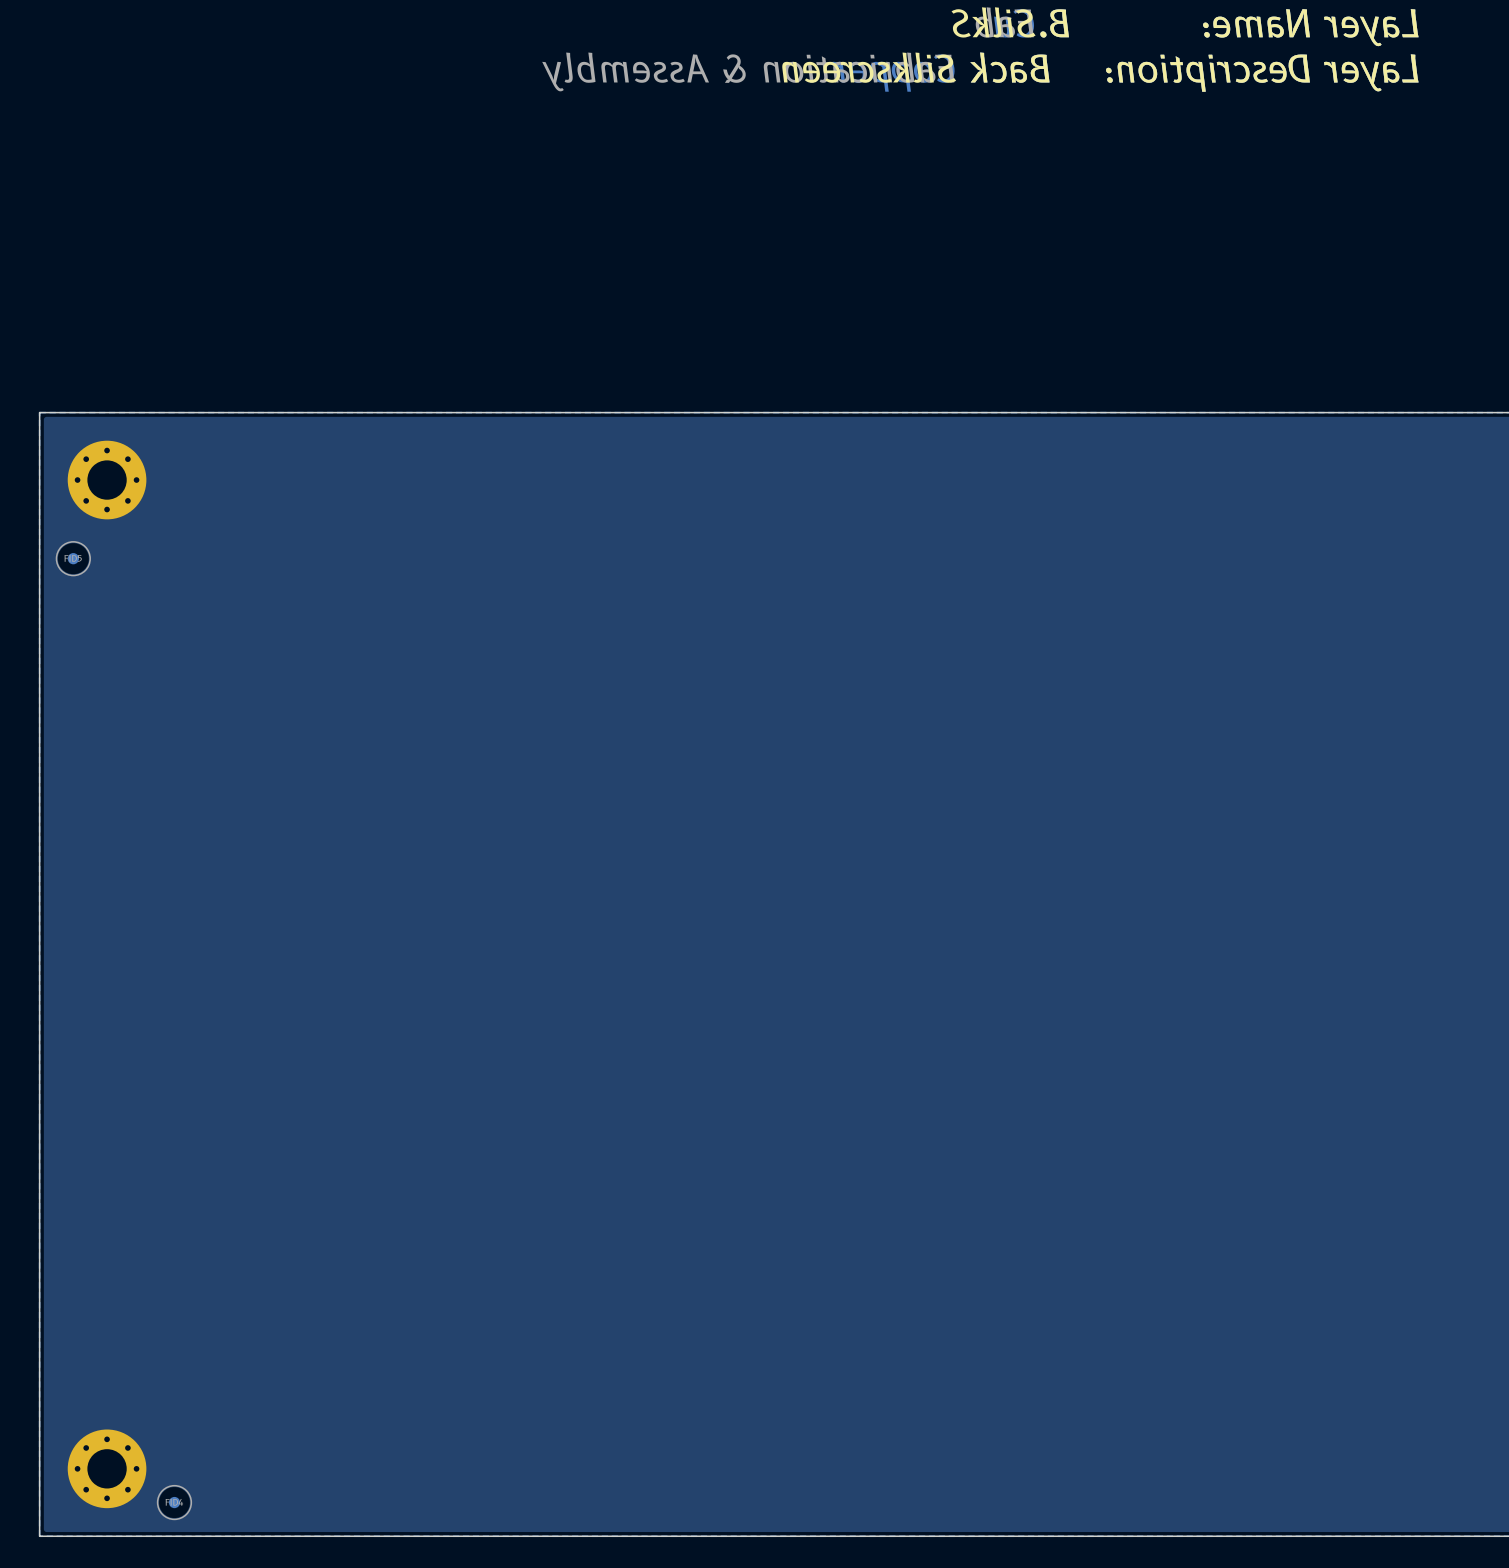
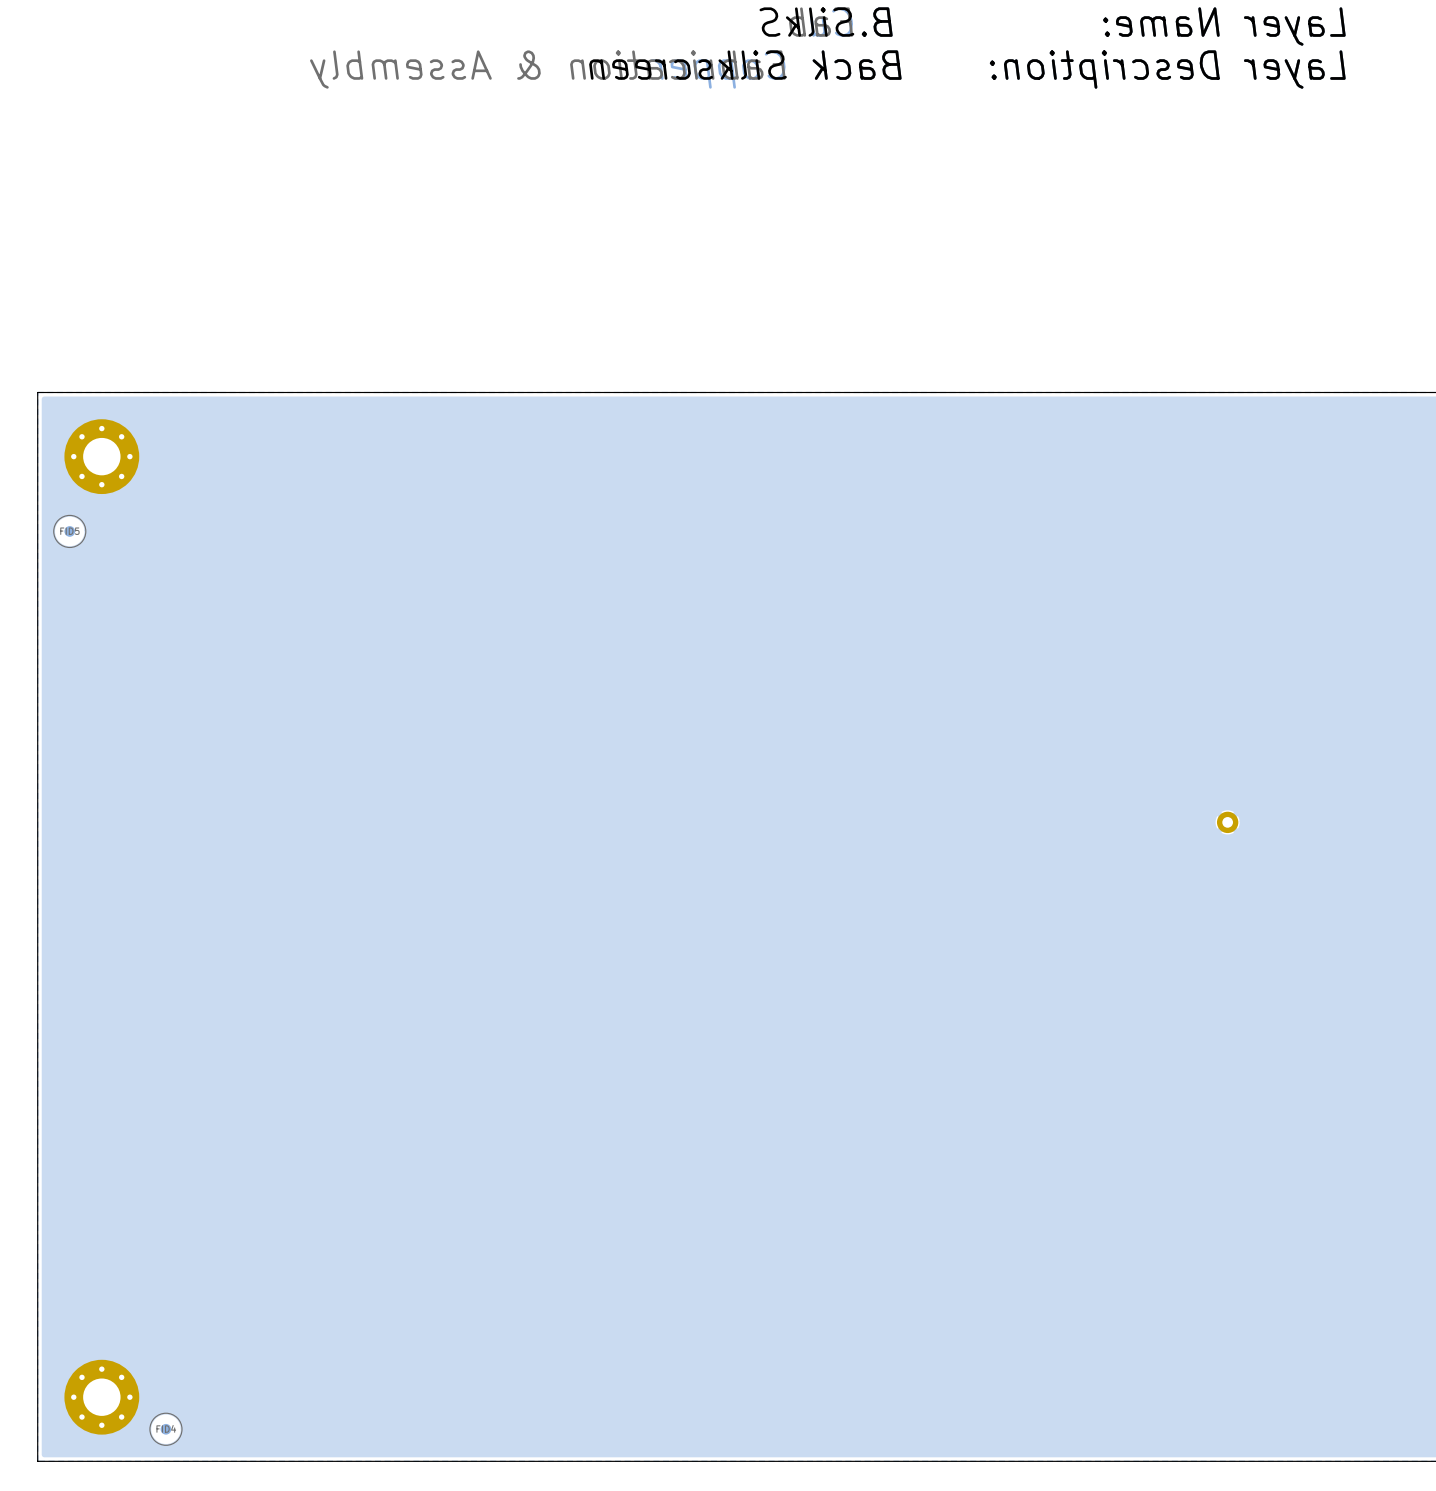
part: none -> (1227, 822)

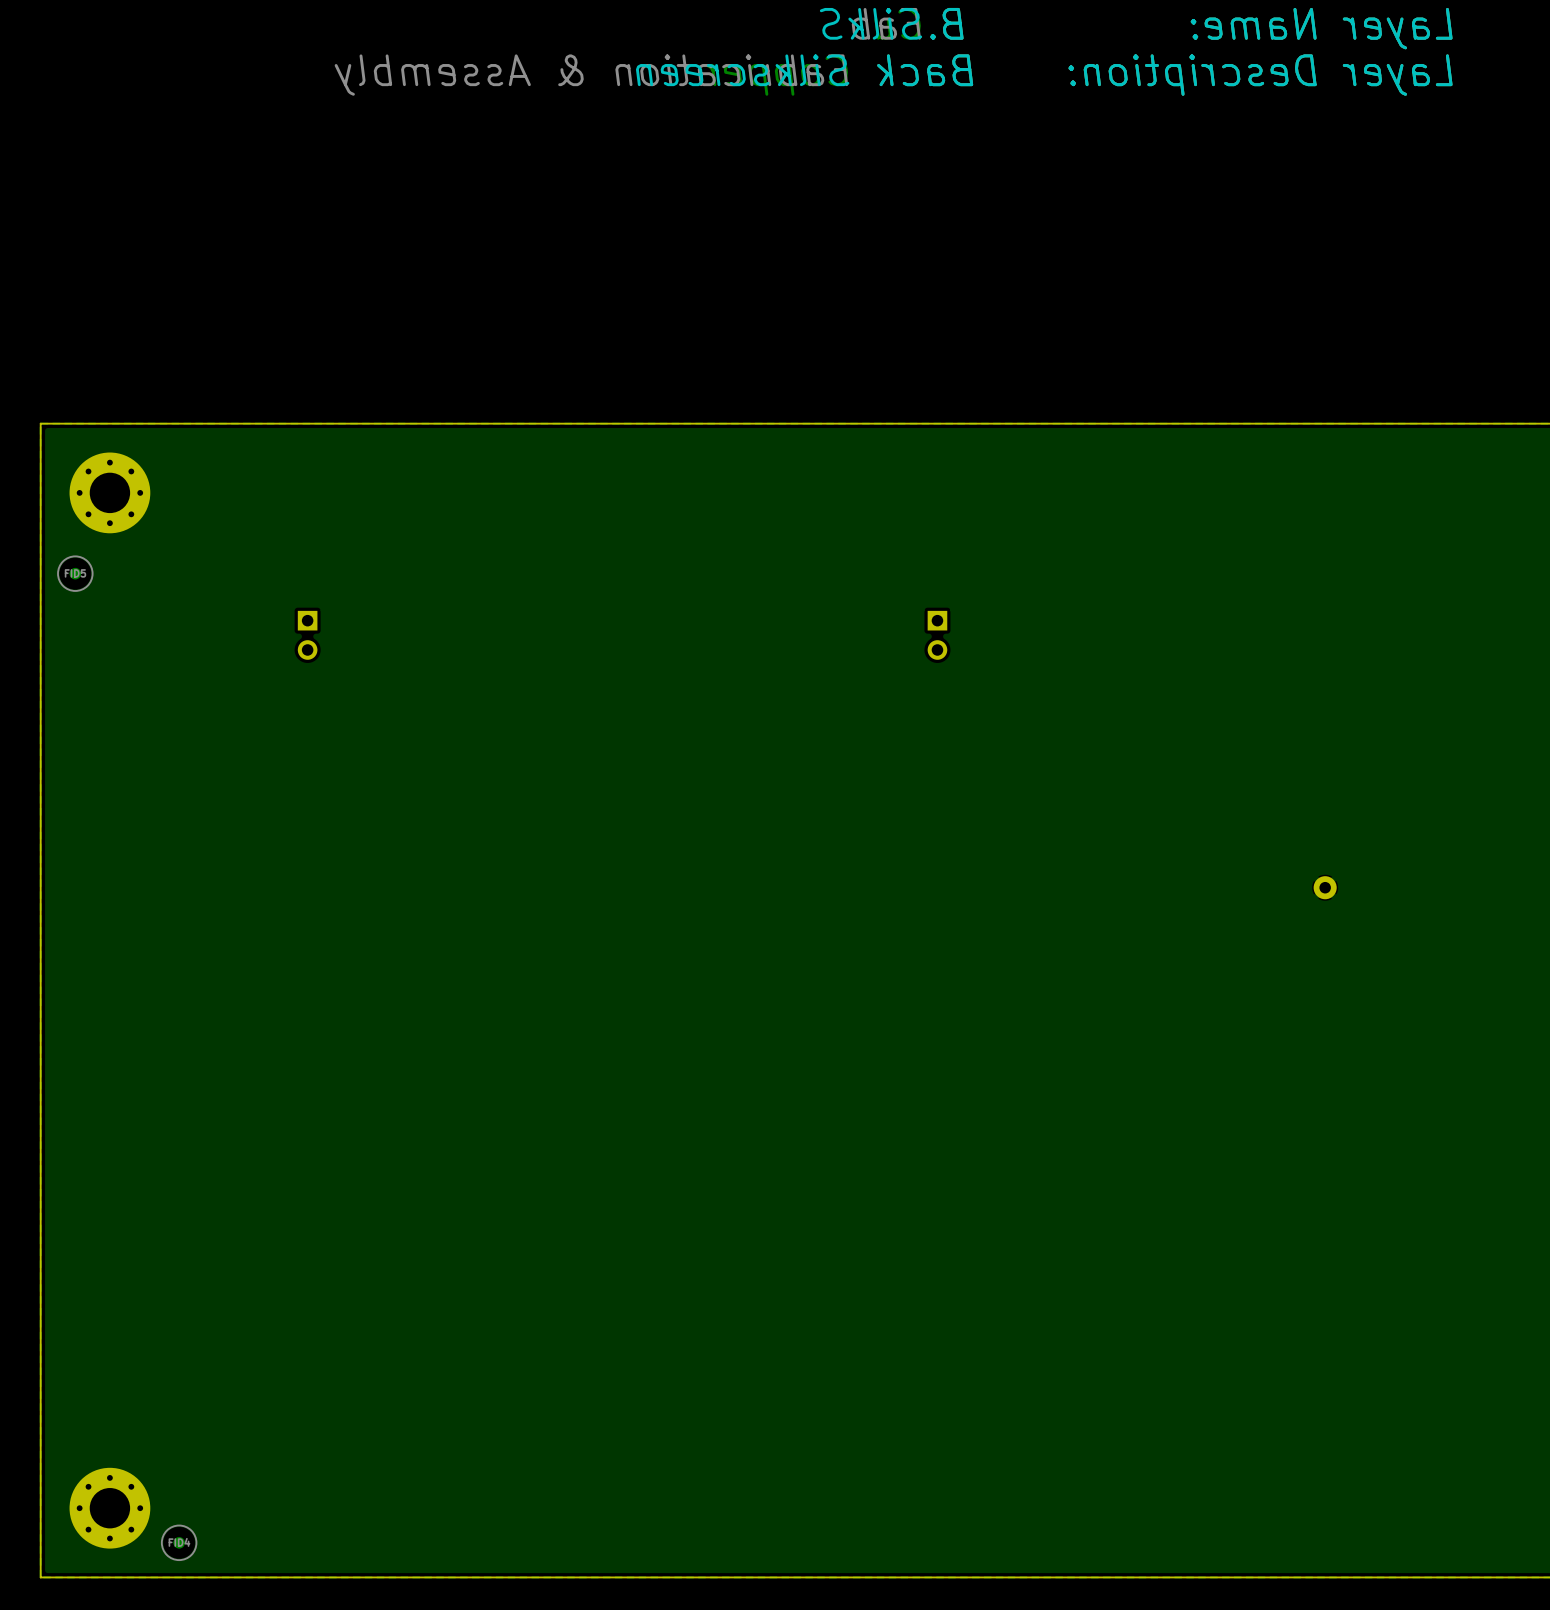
part: none -> (307, 635)
part: none -> (937, 635)

